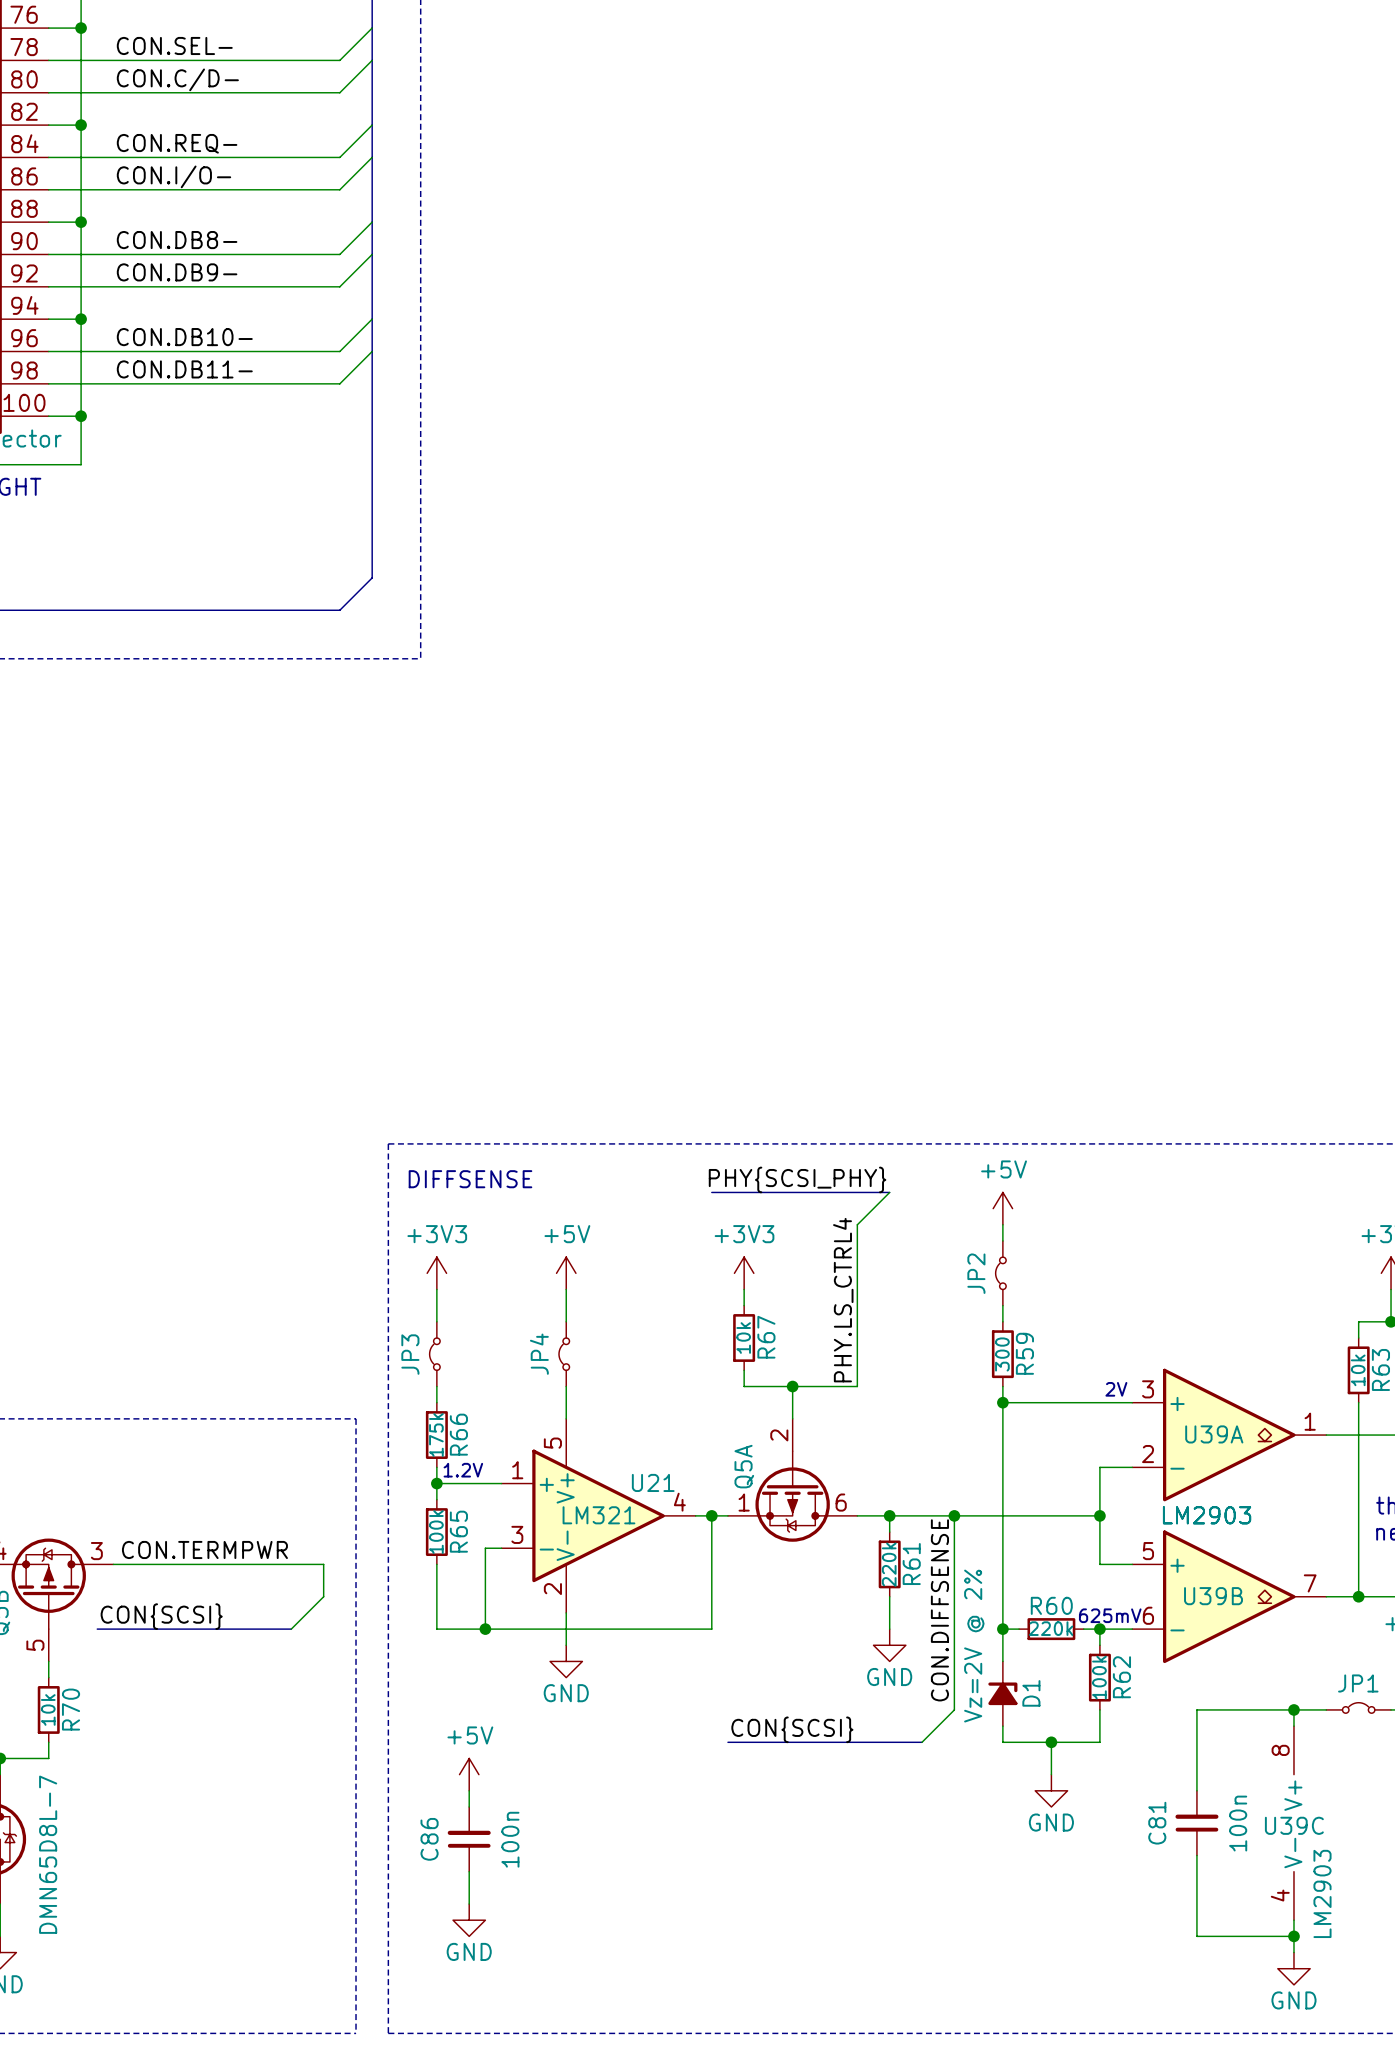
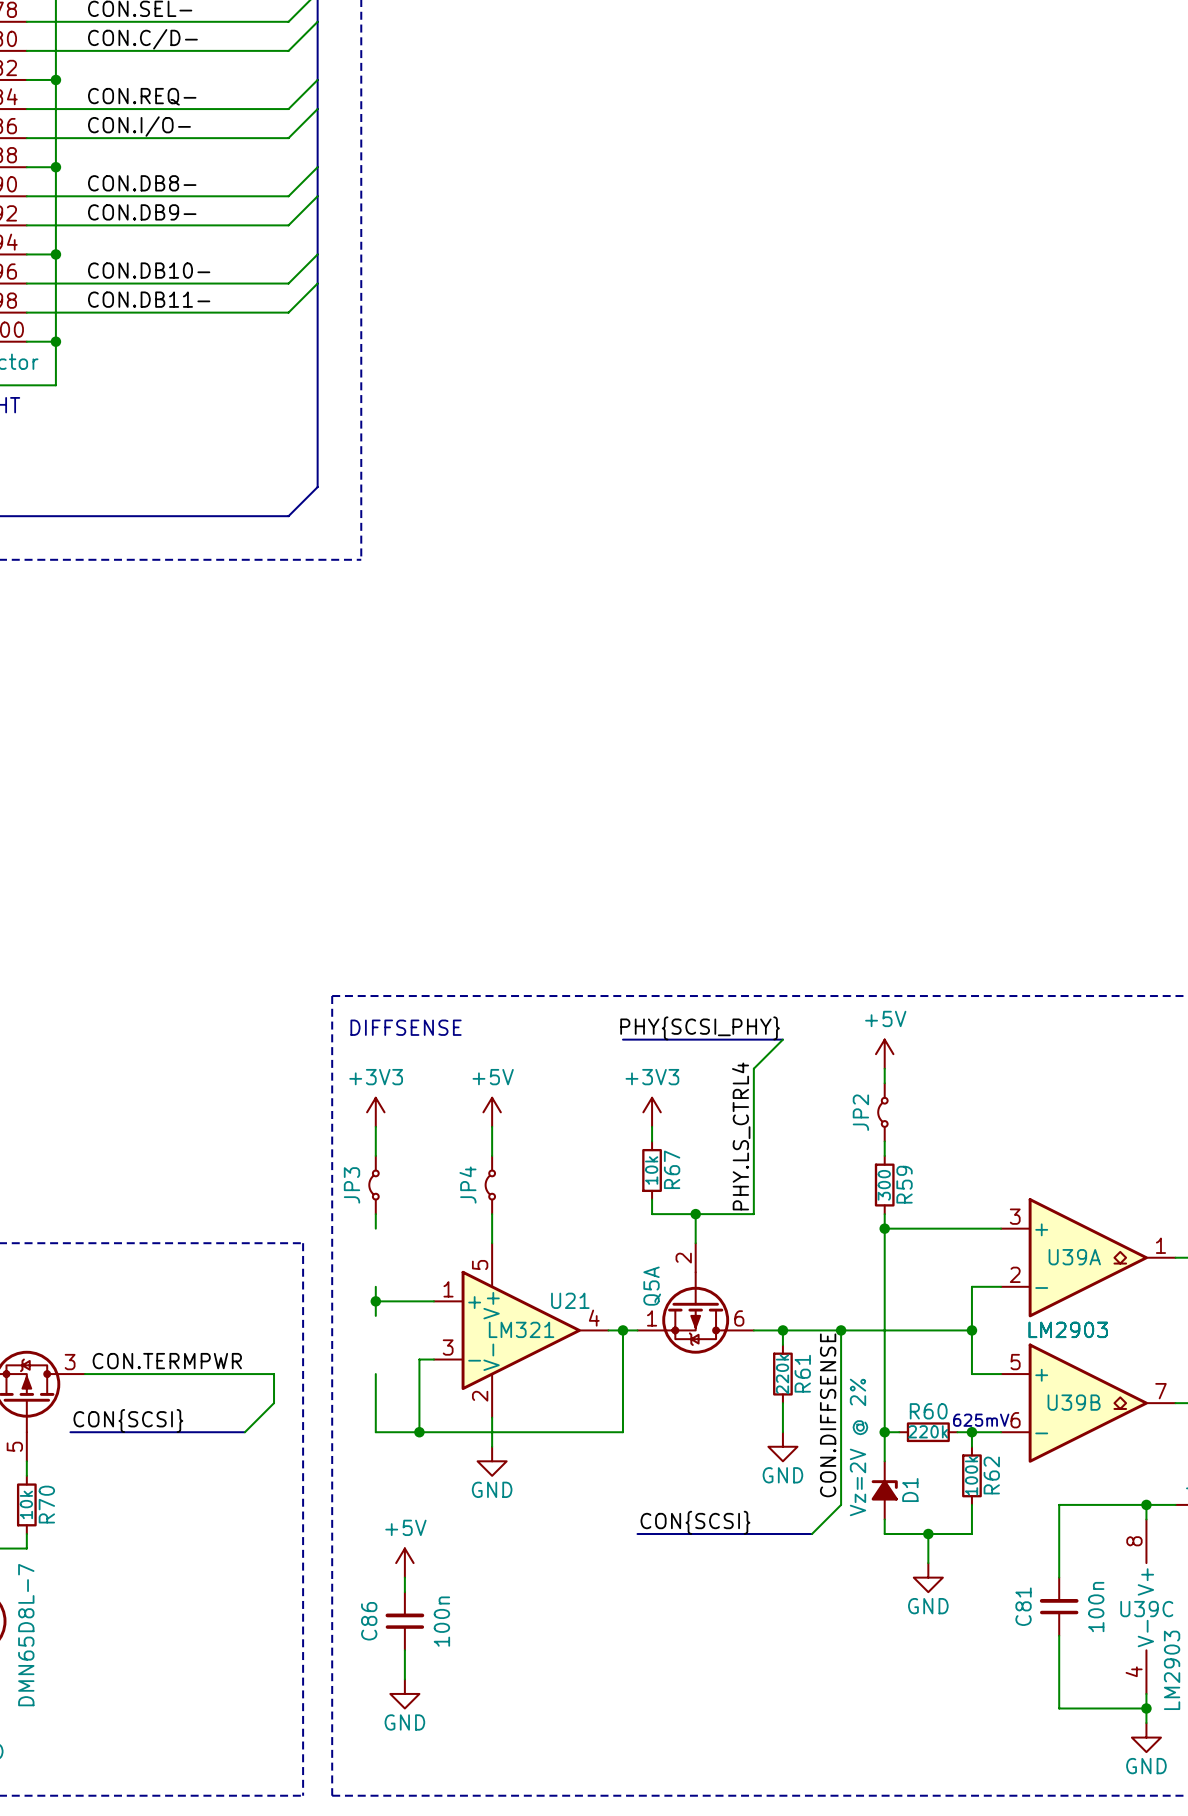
text: 2V (1116, 1389) -> none
R66: 175k (436, 1435) -> none
text: 1.2V (463, 1470) -> none
R65: 100k (436, 1532) -> none

